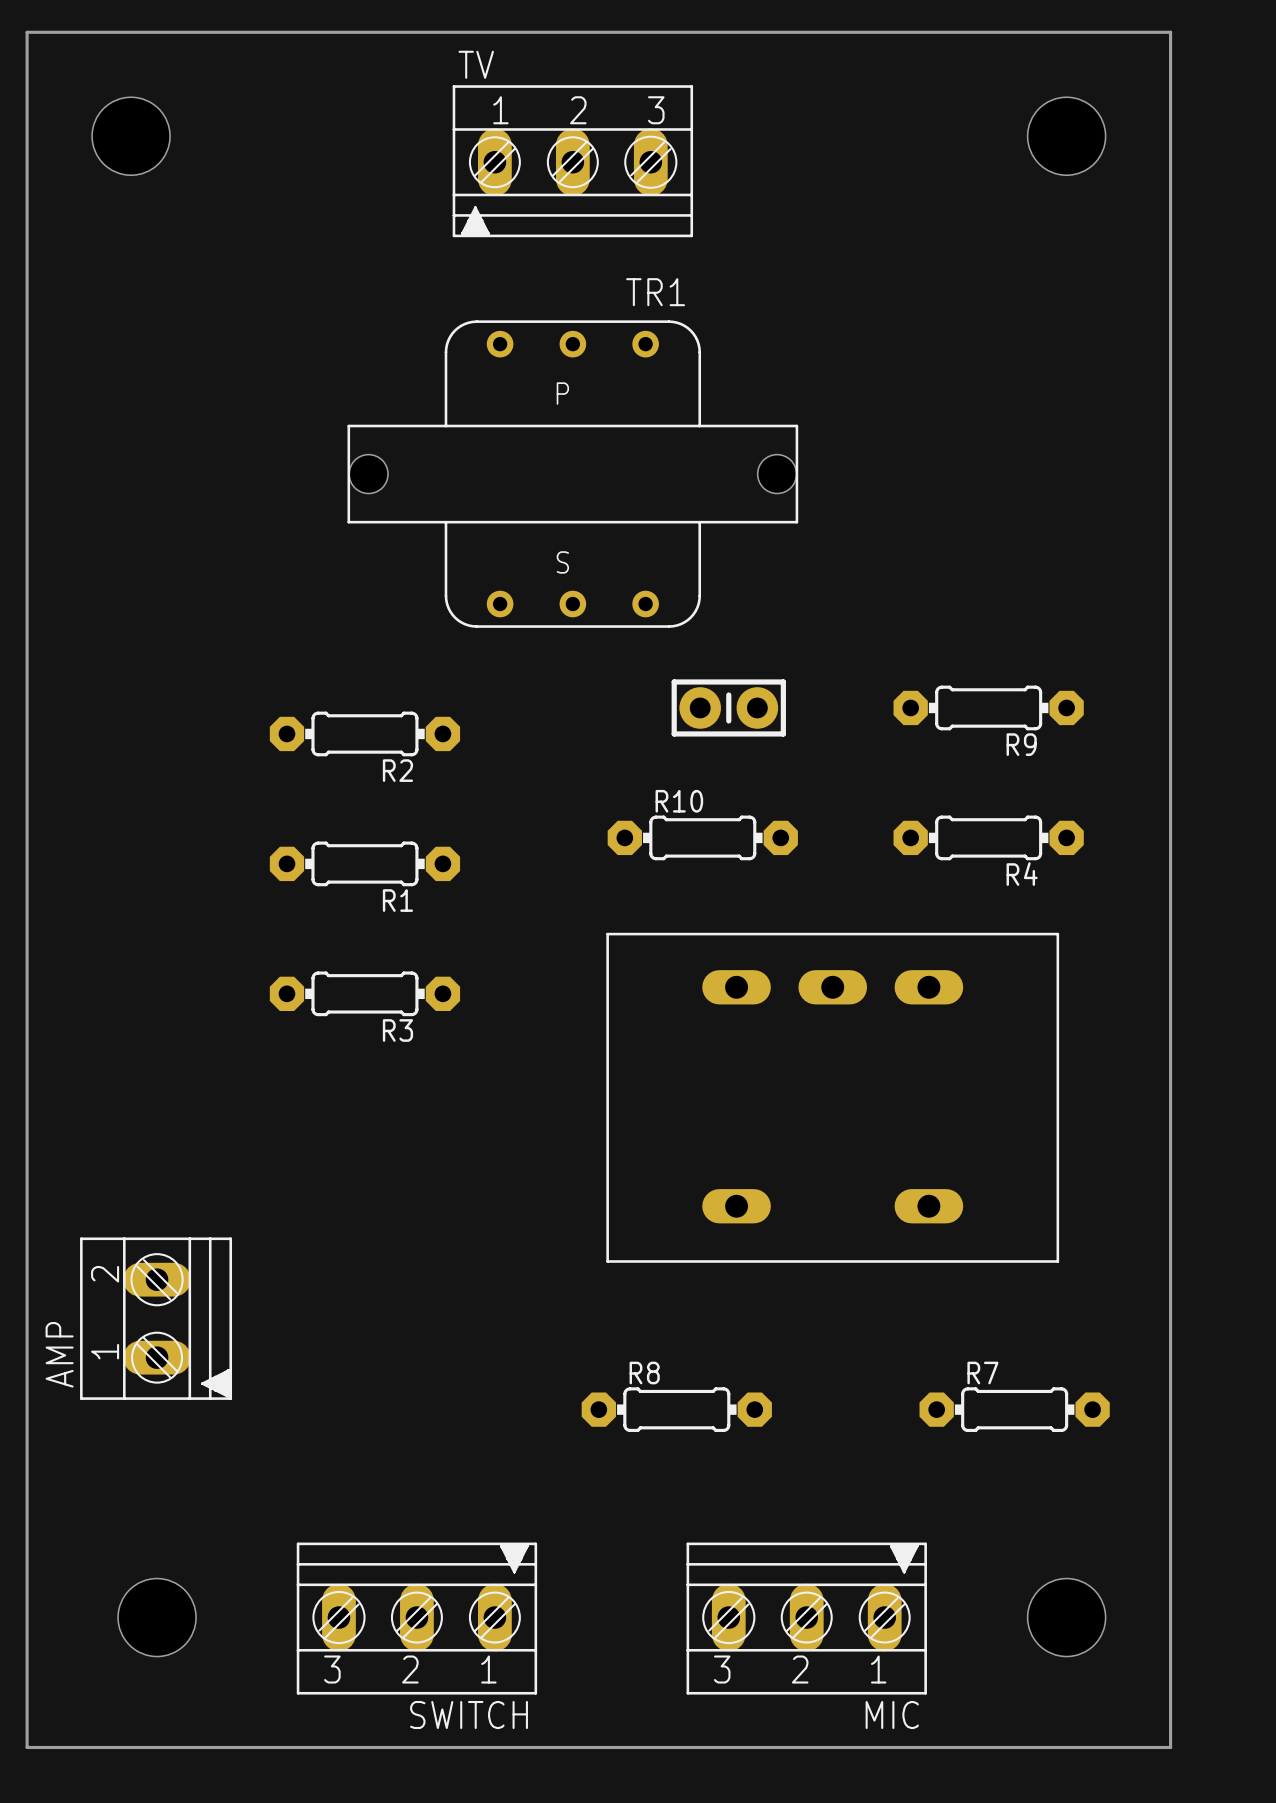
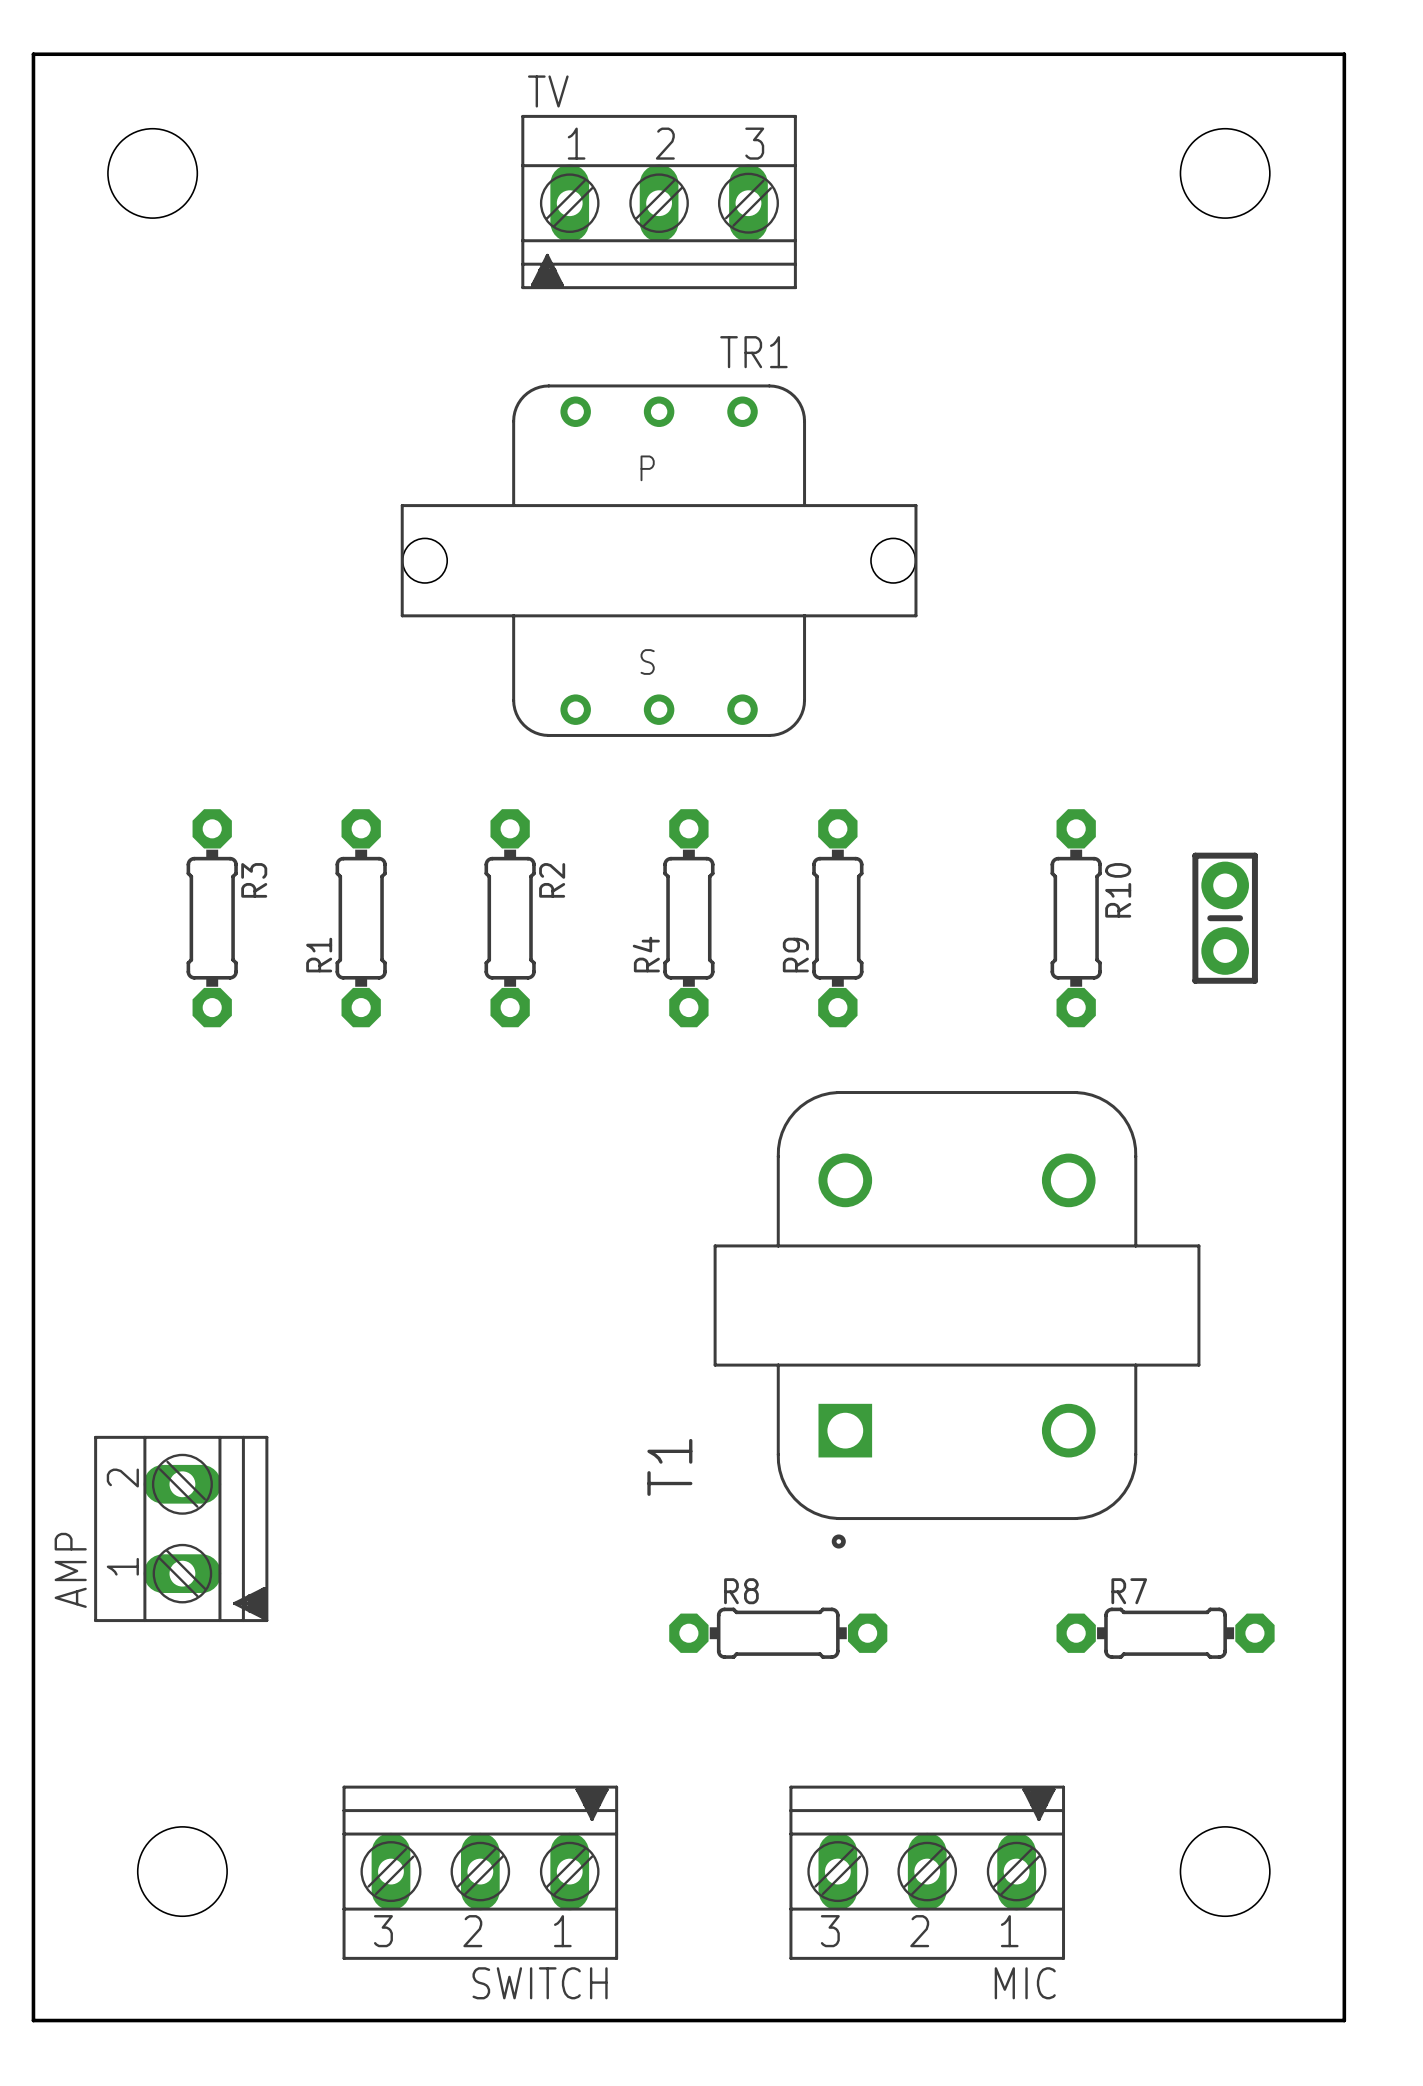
part rotation: 0° (728, 707) -> 90° clockwise (1225, 918)
part position: (728, 707) -> (1225, 918)
R9 rotation: 0° (988, 707) -> 90° clockwise (837, 918)
R9 position: (988, 707) -> (837, 918)
R2 rotation: 0° (364, 733) -> 90° clockwise (510, 918)
R2 name position: R2 (397, 770) -> R2 (552, 880)
R10 rotation: 0° (702, 837) -> 90° clockwise (1076, 918)
R10 position: (702, 837) -> (1076, 918)
R4 rotation: 0° (988, 837) -> 90° clockwise (688, 918)
R4 position: (988, 837) -> (688, 918)
R1 rotation: 0° (364, 863) -> 90° clockwise (361, 918)
R3 rotation: 0° (364, 993) -> 90° clockwise (212, 918)
R3 position: (364, 993) -> (212, 918)
R3 name position: R3 (397, 1030) -> R3 (254, 880)
part: (832, 1097) -> none
T1: none -> (957, 1319)

